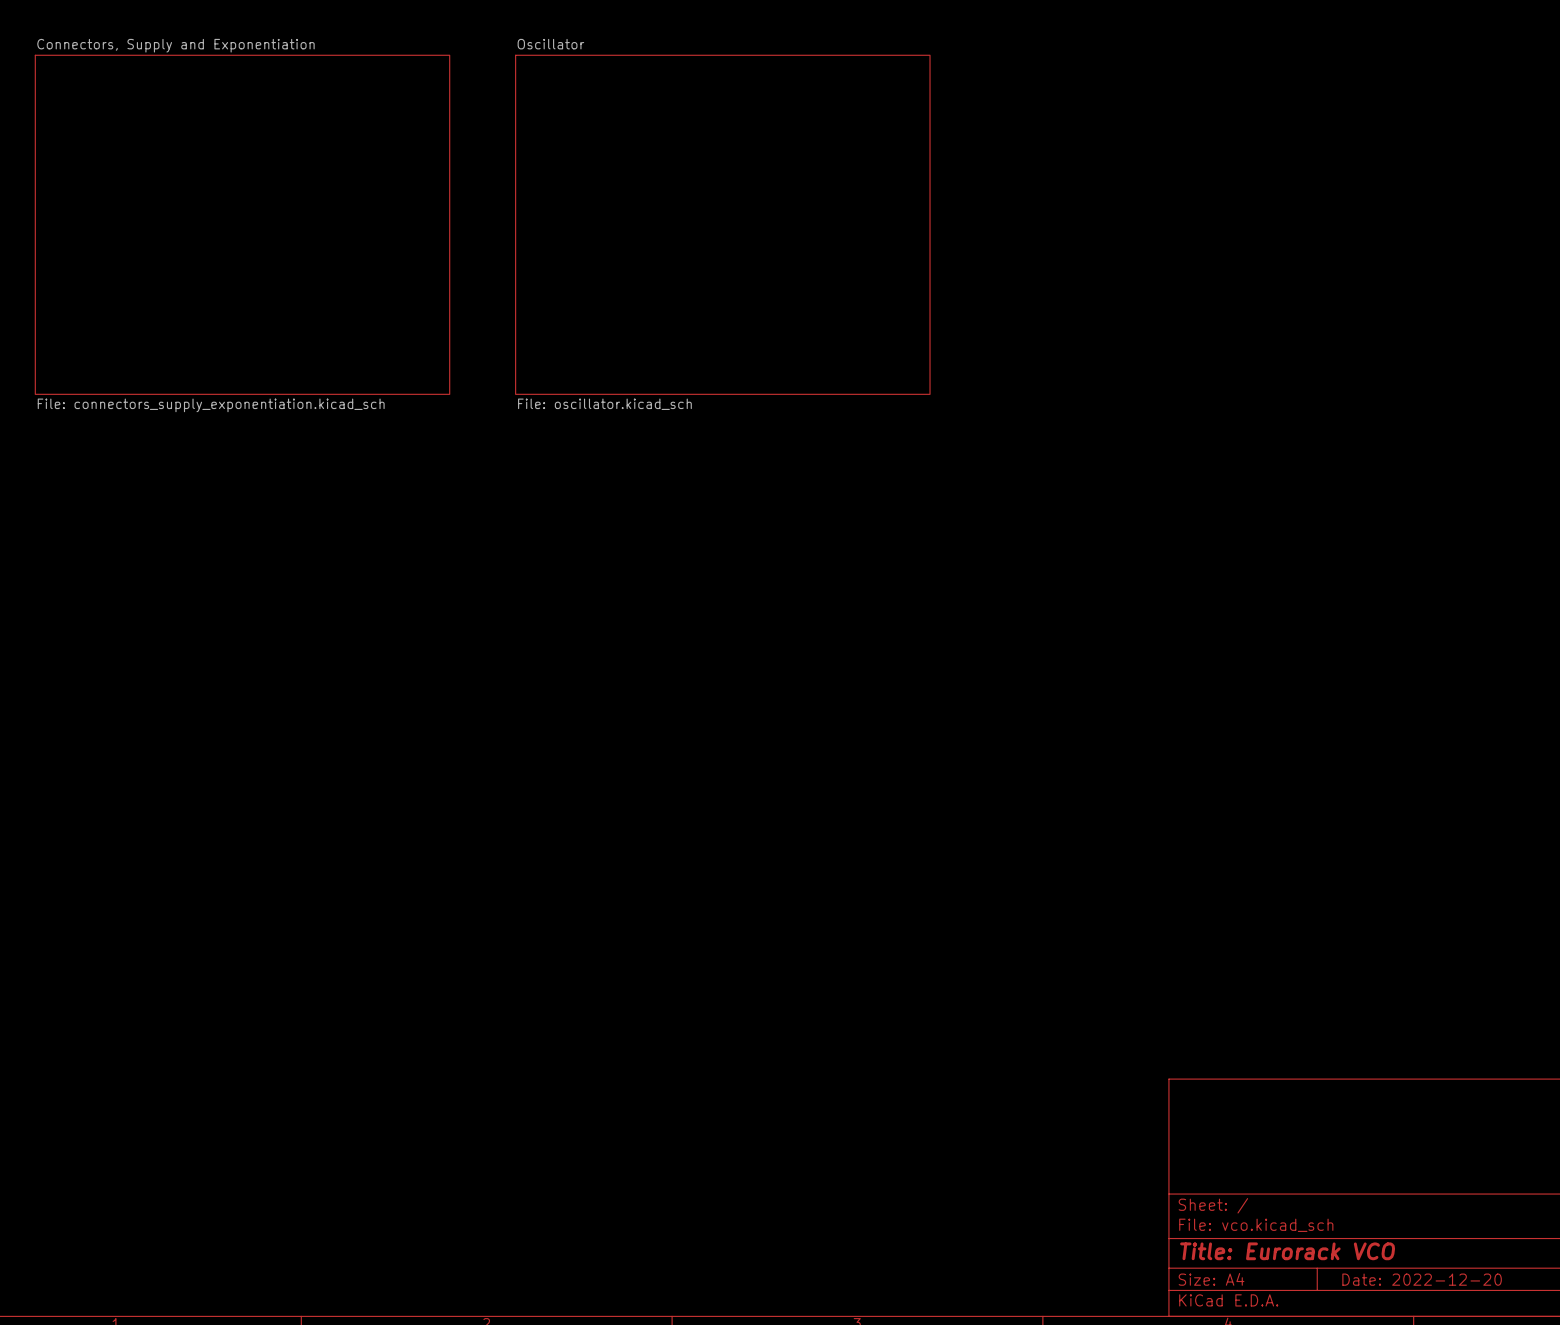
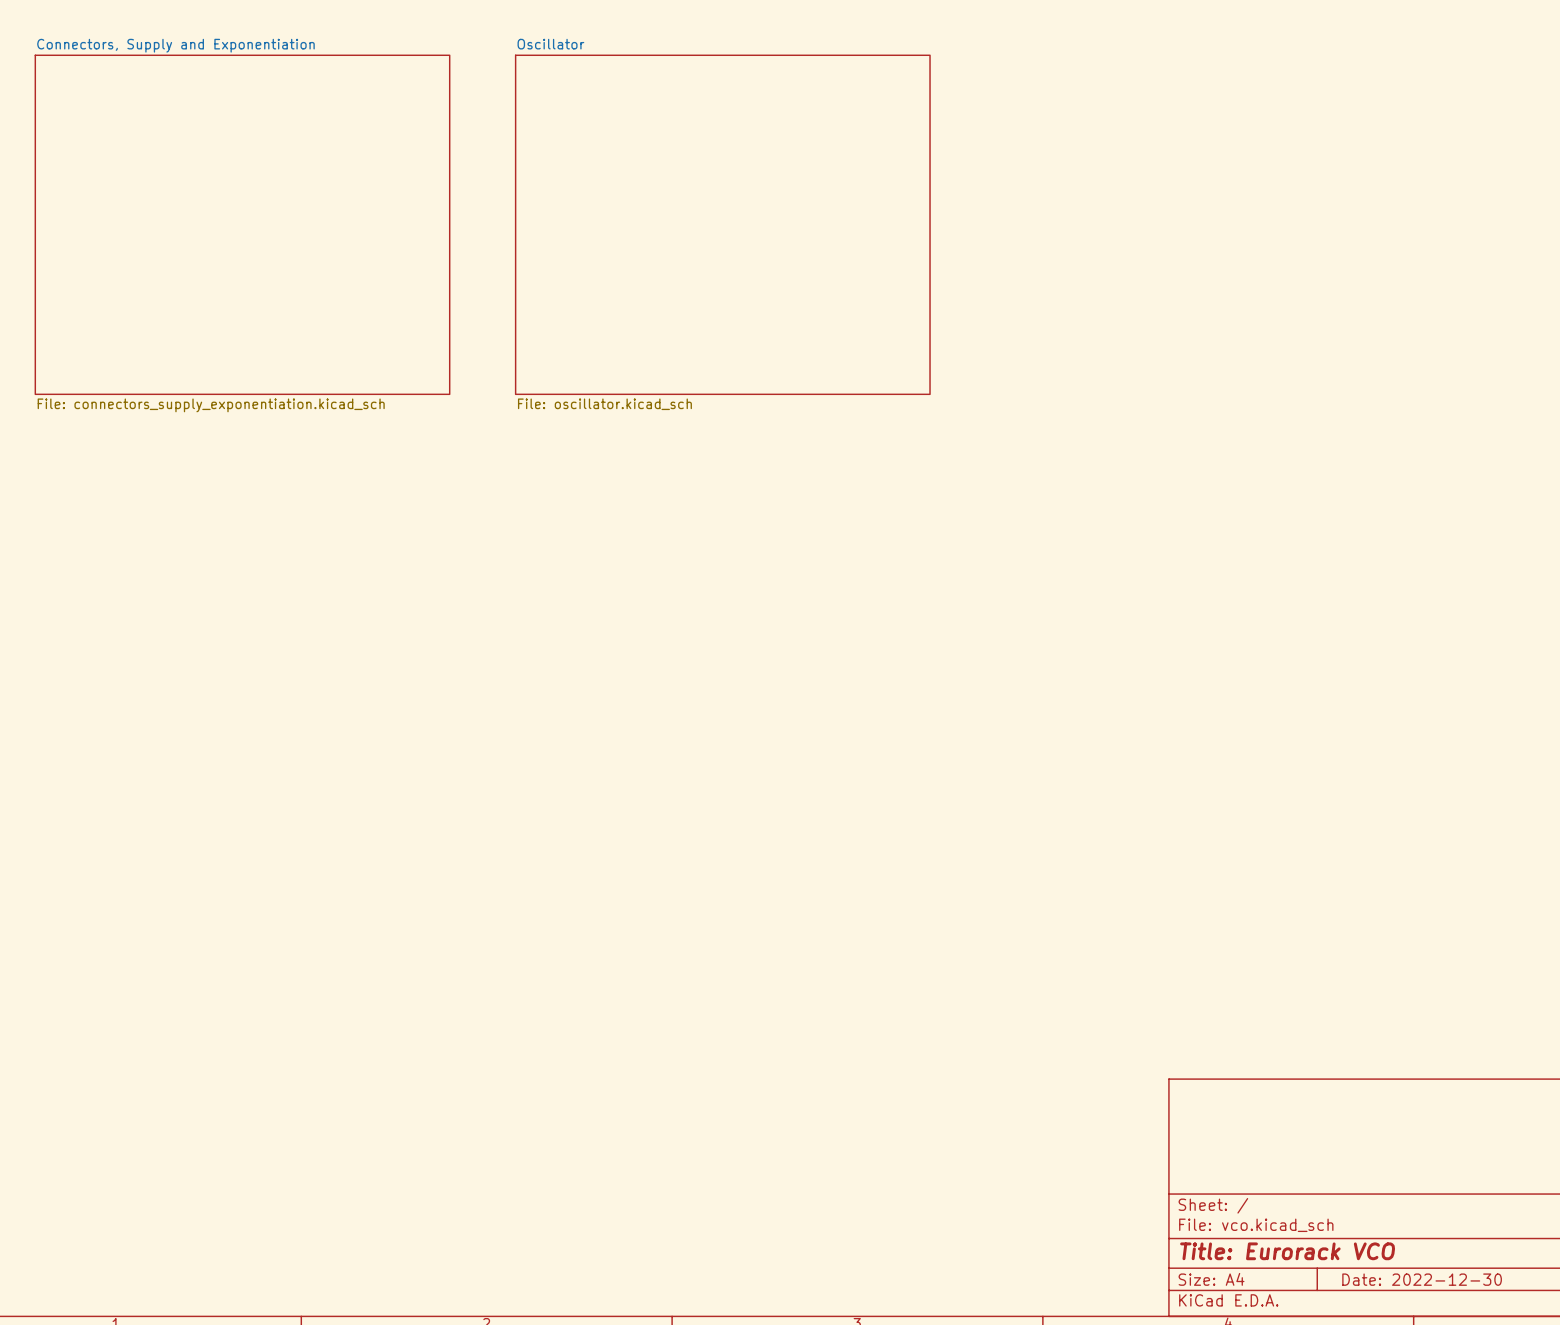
title block: Date: 2022-12-20 (1422, 1279) -> Date: 2022-12-30 (1422, 1279)

